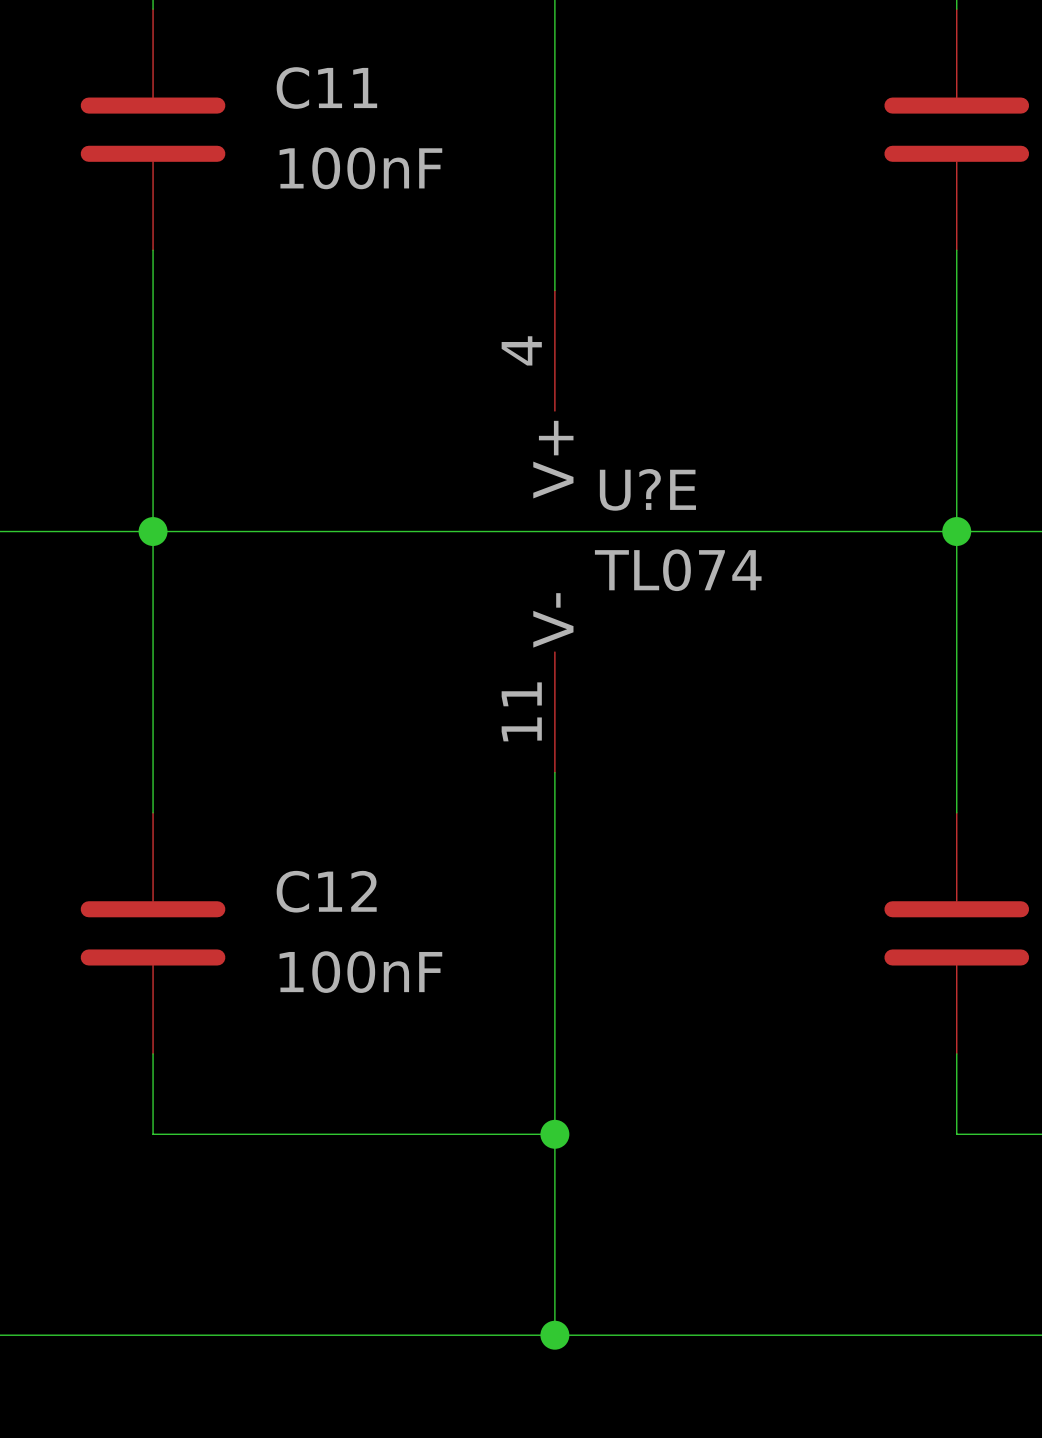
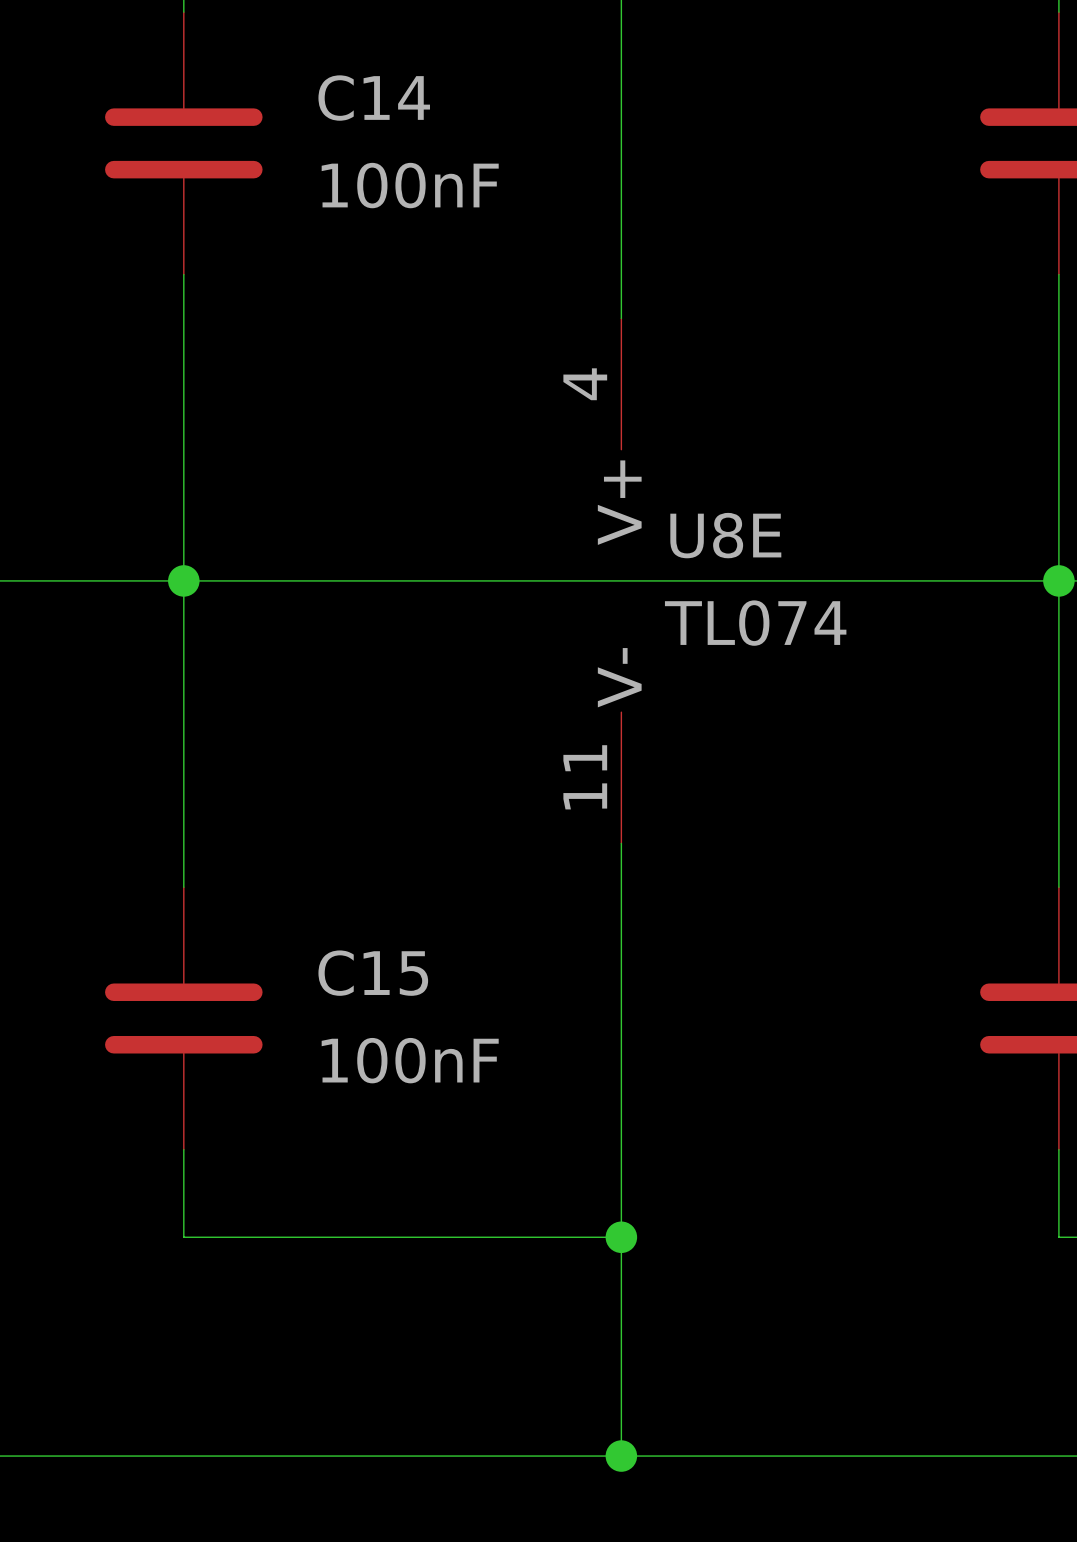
C11 name: C11 (326, 88) -> C14 (374, 98)
U?E name: U?E (647, 489) -> U8E (725, 535)
C12 name: C12 (326, 891) -> C15 (373, 973)

